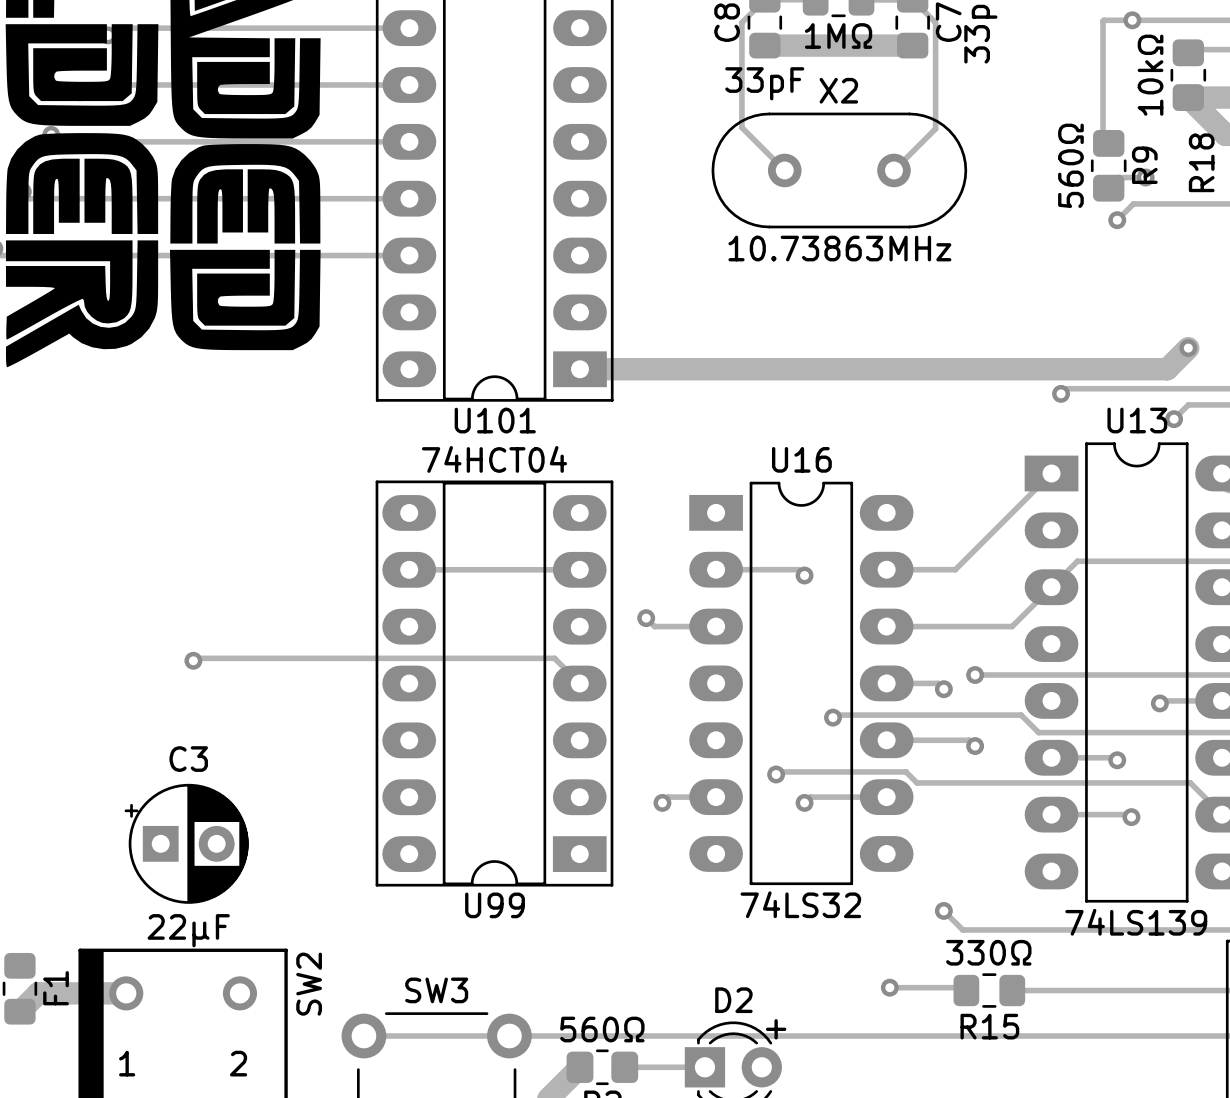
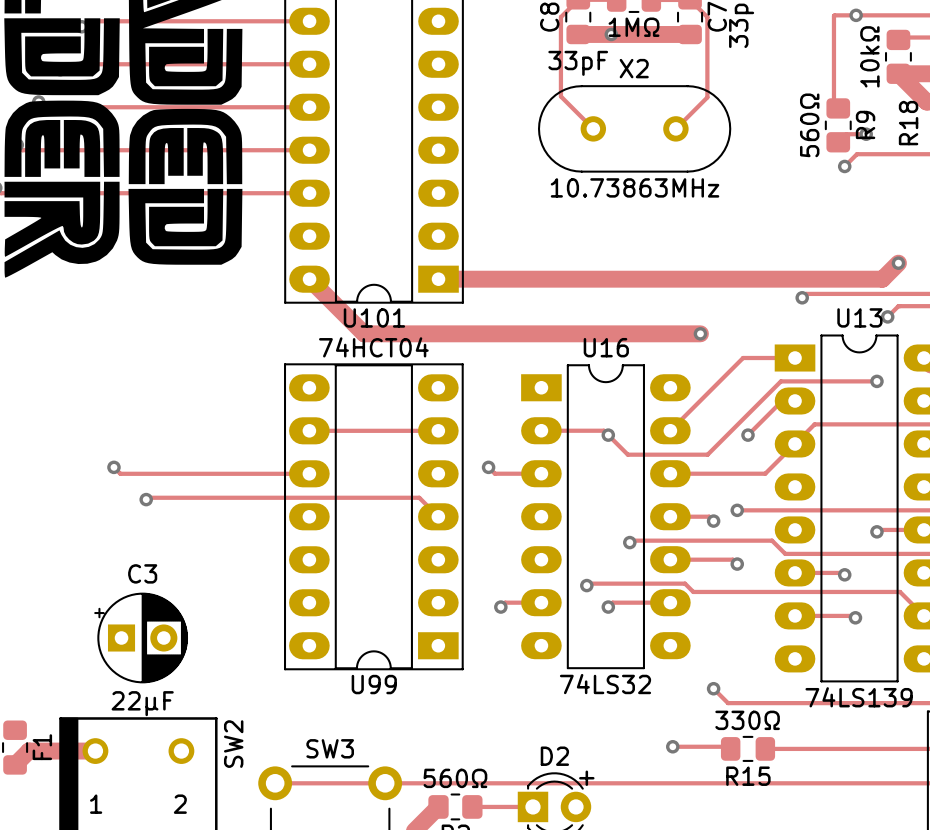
via: none -> (611, 34)
track: none -> (309, 279) (364, 333) (700, 333)
via: none -> (700, 333)
track: (1051, 473) (955, 569) (886, 569) -> (795, 358) (743, 358) (670, 430)
track: none -> (876, 381) (780, 381) (707, 454) (627, 454) (608, 435)
via: none -> (876, 381)
track: none -> (795, 400) (782, 400) (748, 435)
via: none -> (748, 435)
track: none -> (113, 467) (120, 473) (309, 473)
via: none -> (113, 467)

